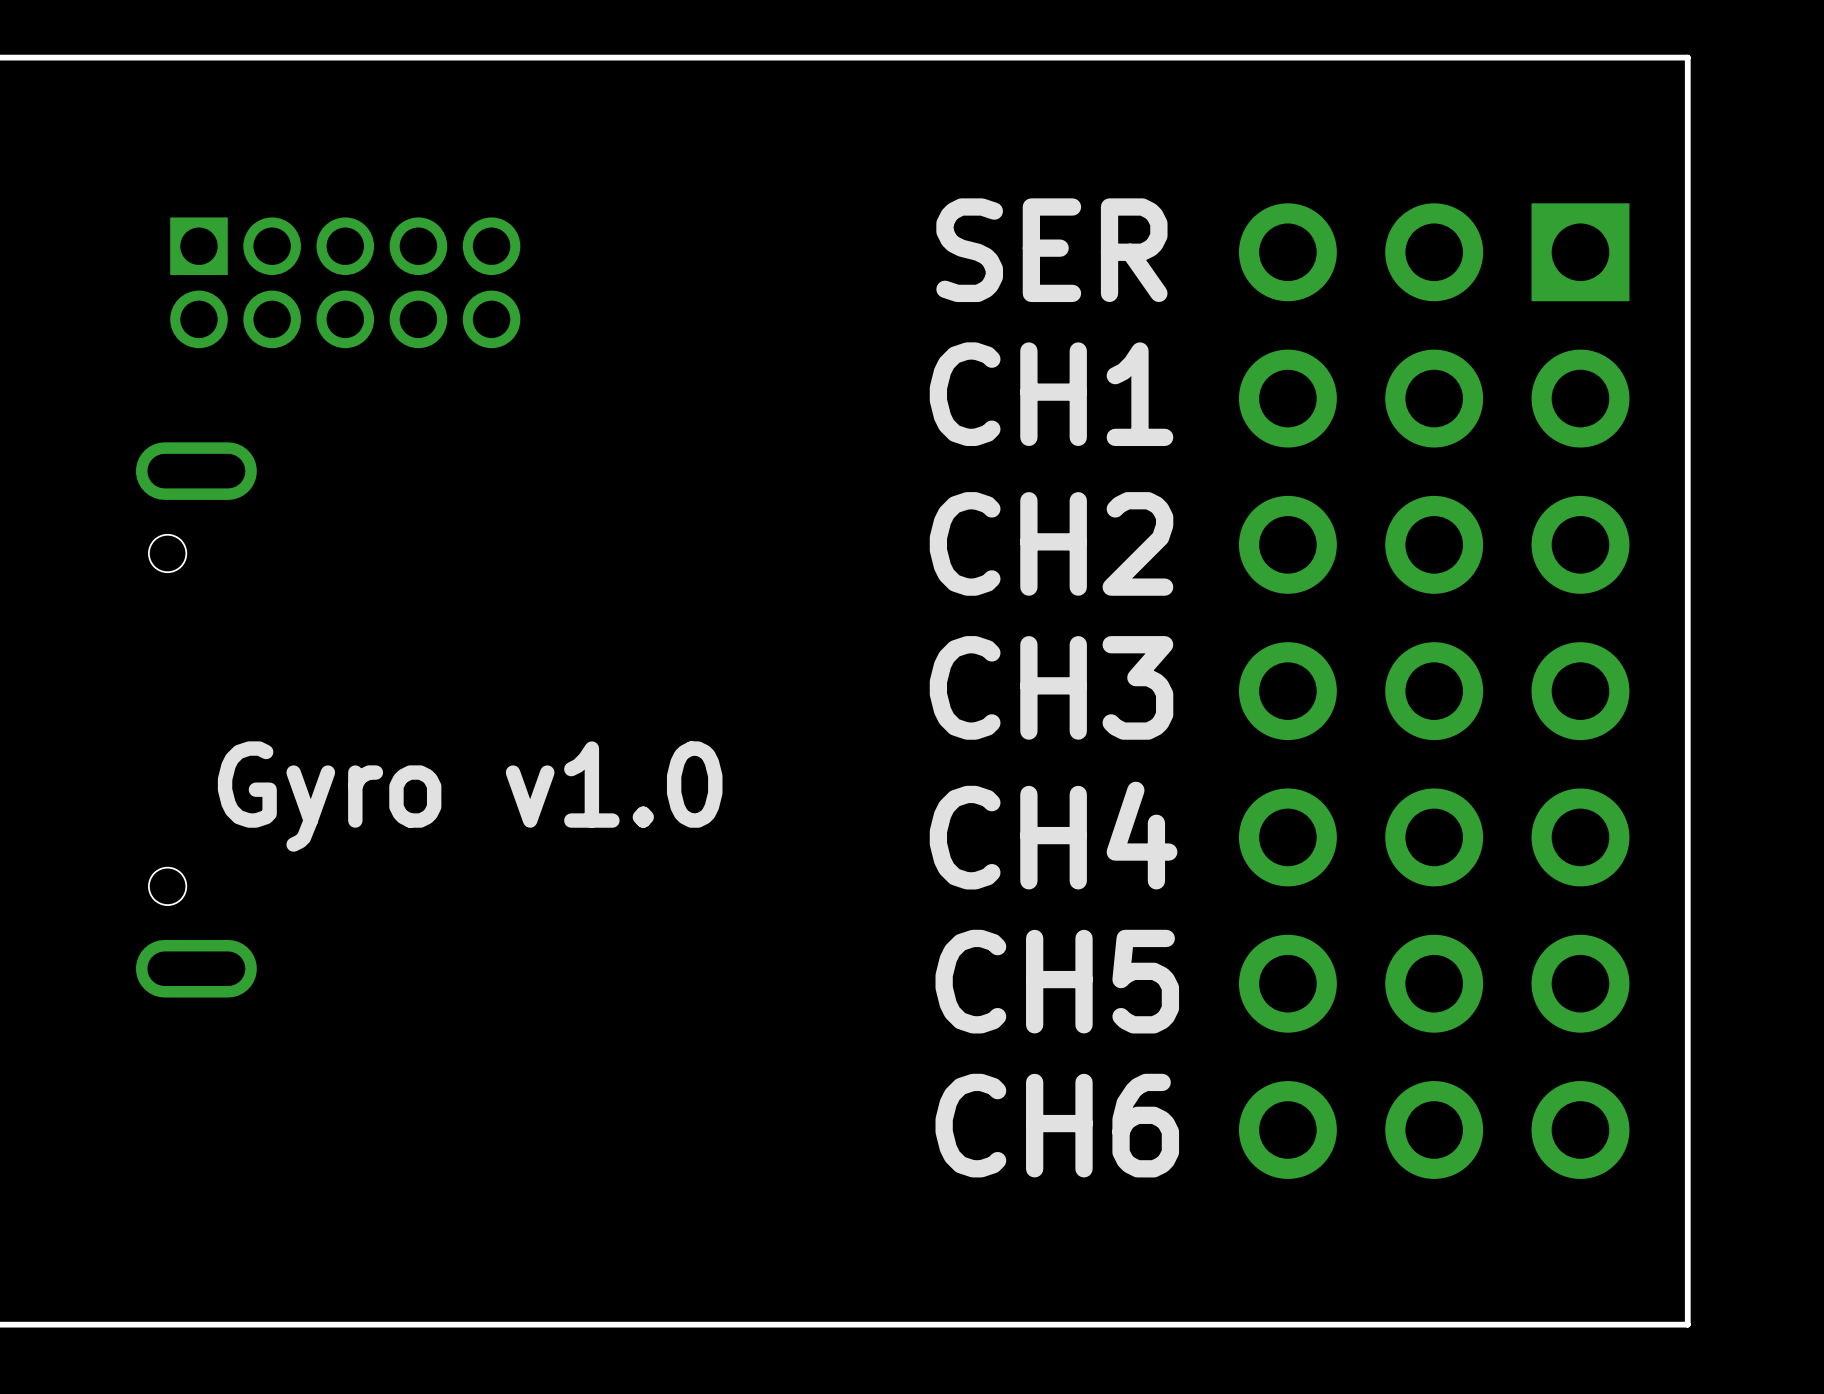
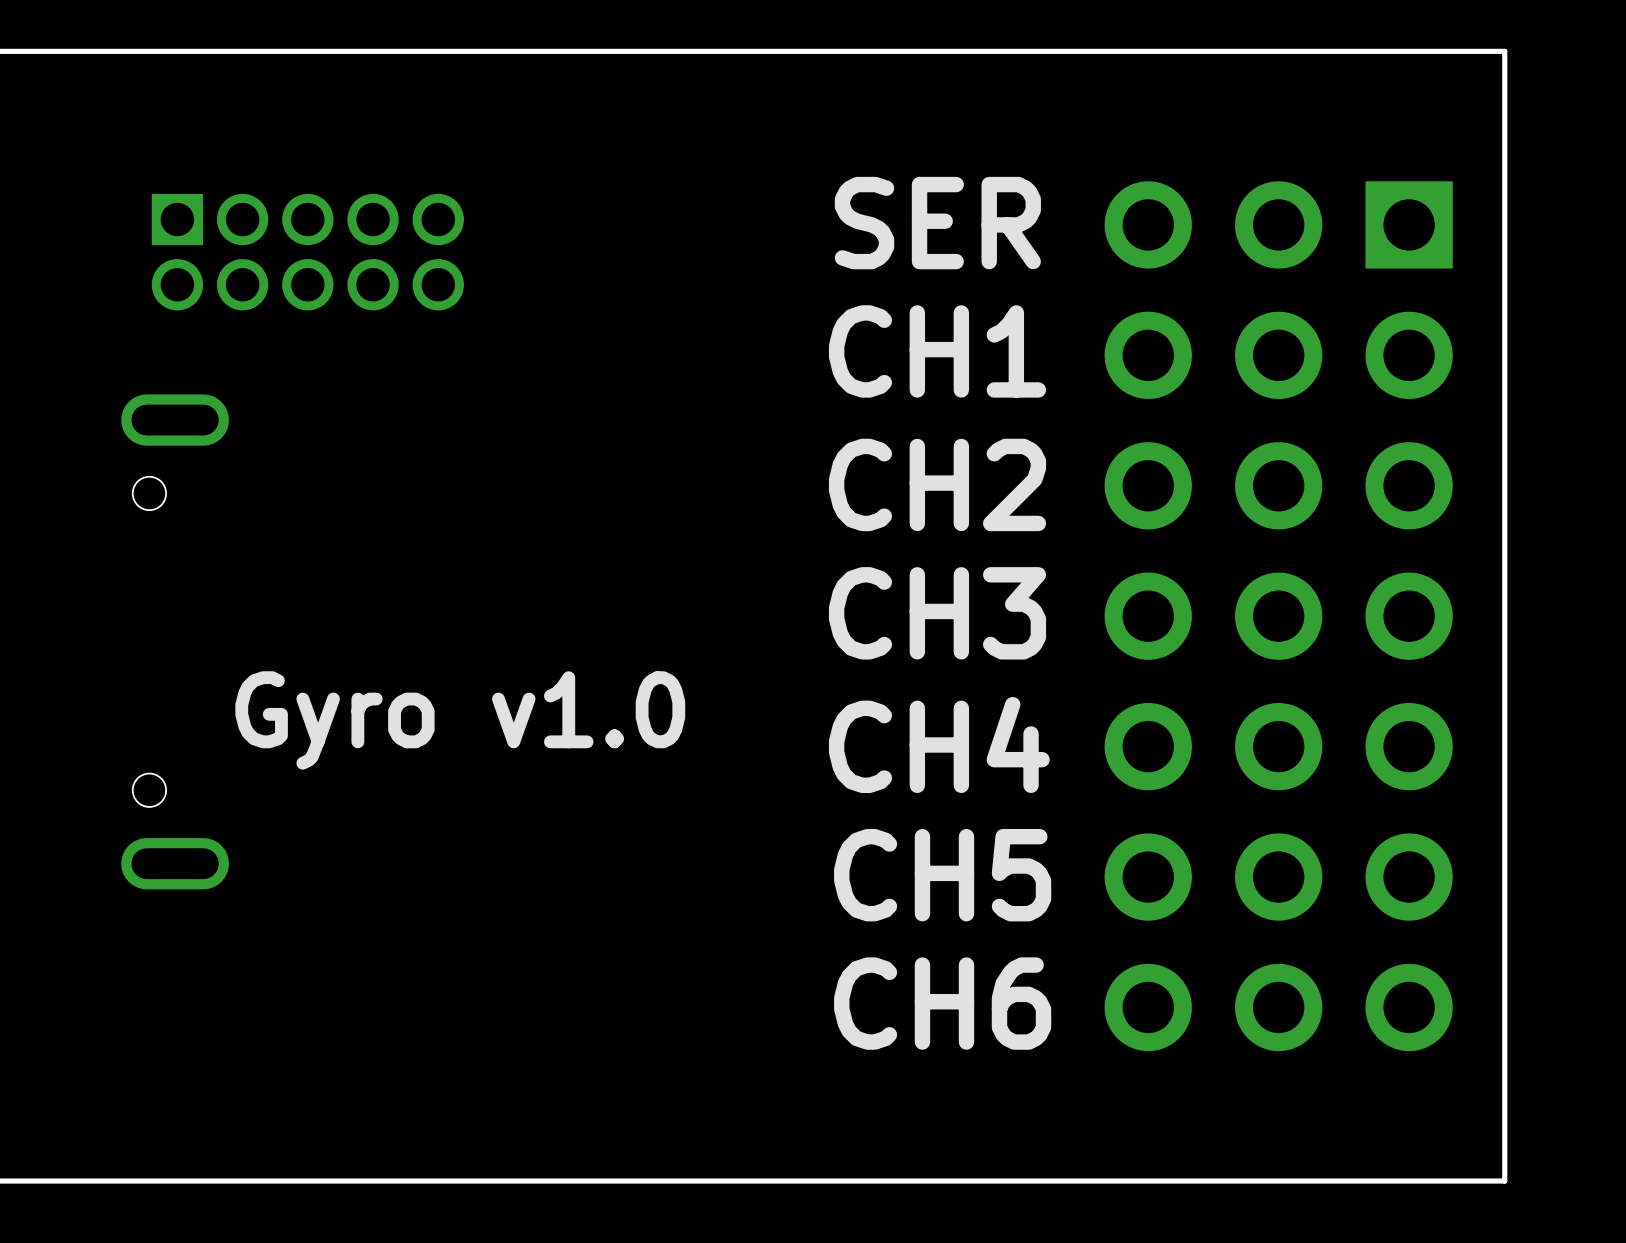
text position: Gyro v1.0 (470, 796) -> Gyro v1.0 (460, 720)

